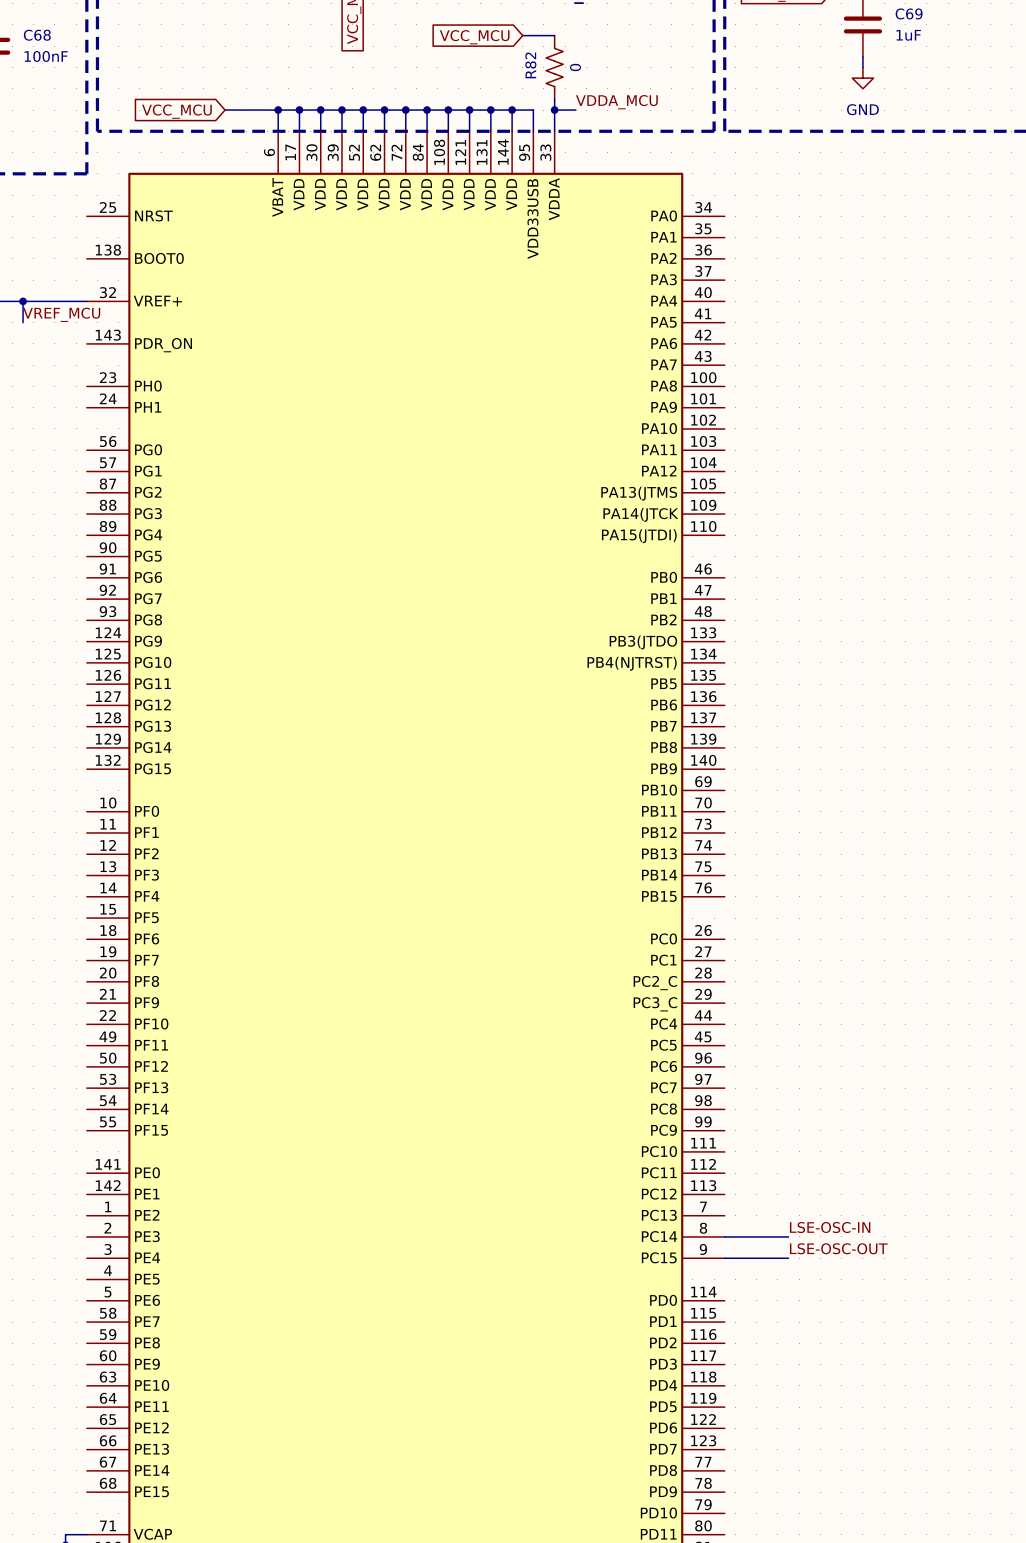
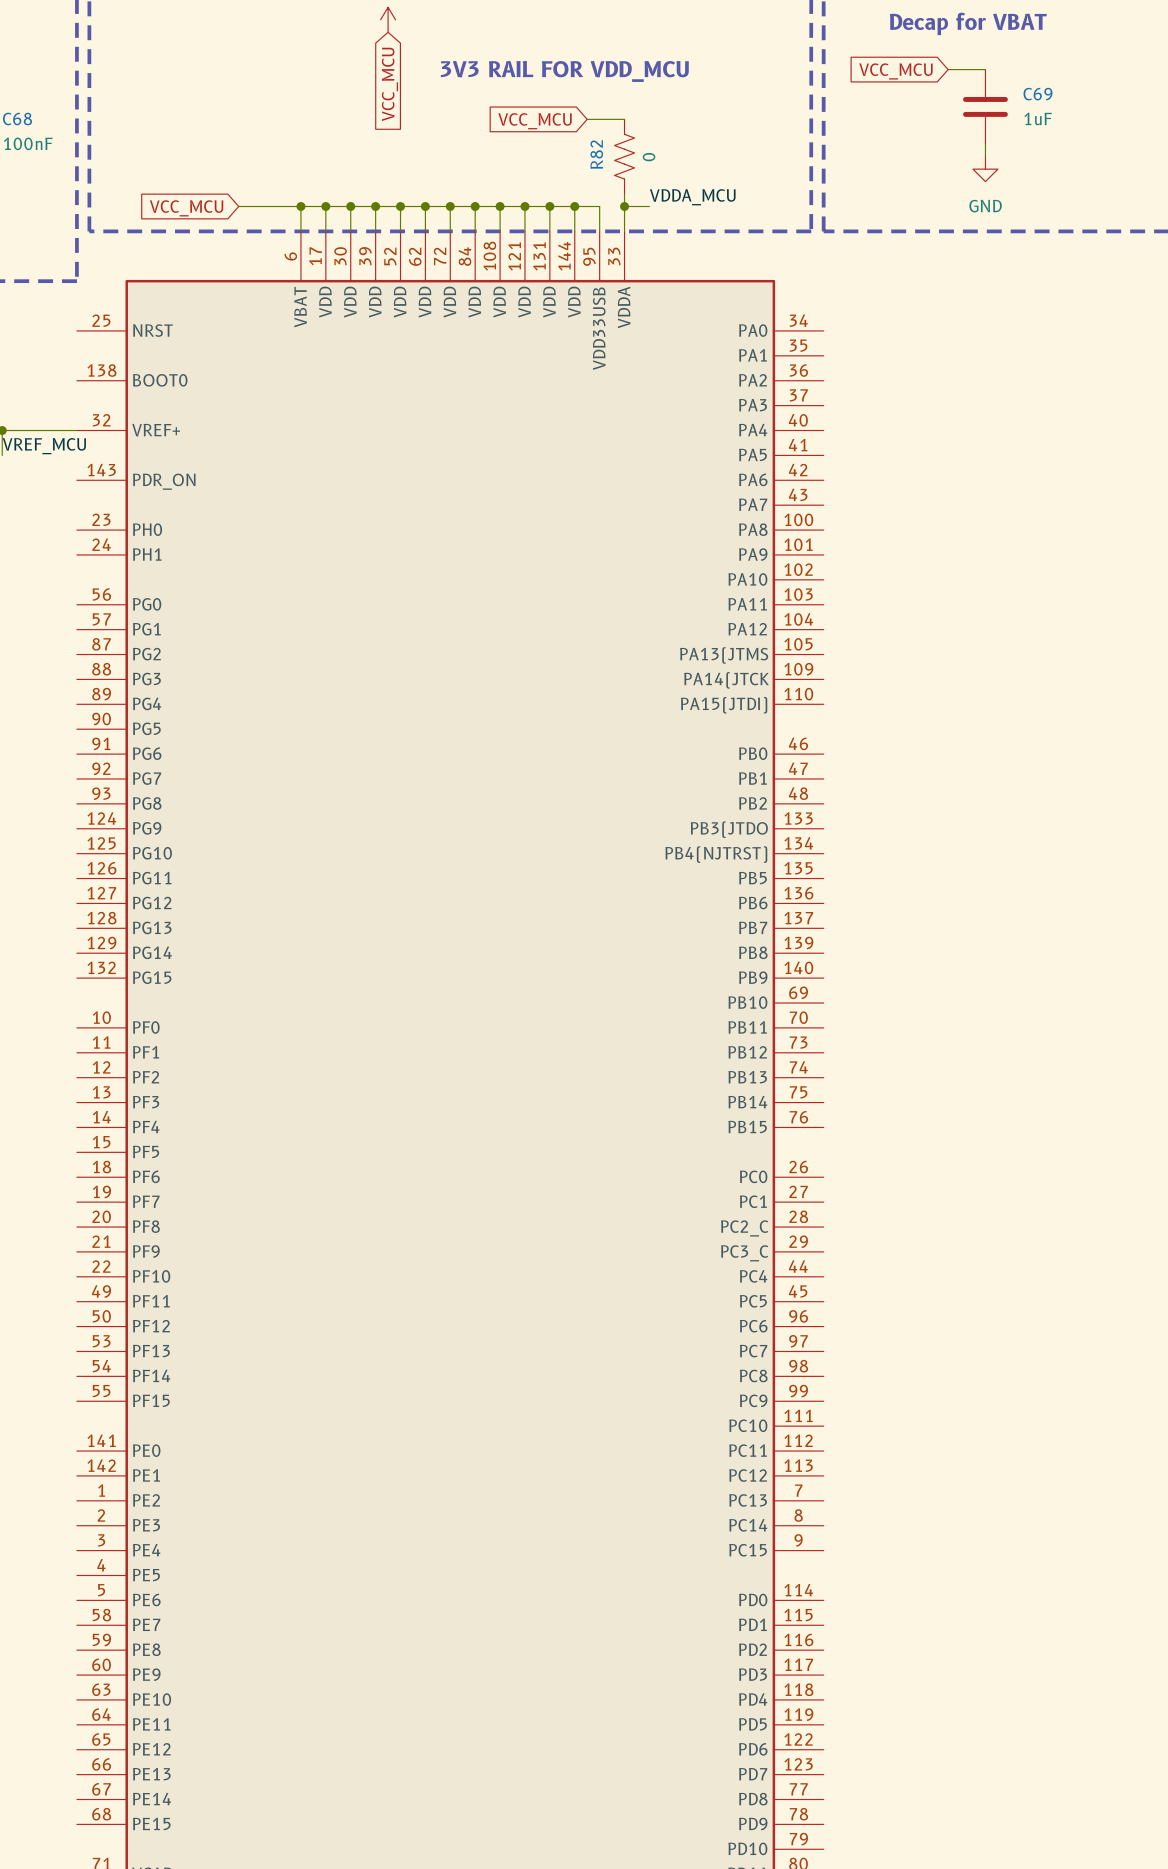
label: LSE-OSC-IN (830, 1227) -> none
wire: (724, 1236) (788, 1236) -> none
label: LSE-OSC-OUT (838, 1248) -> none
wire: (724, 1258) (788, 1258) -> none

